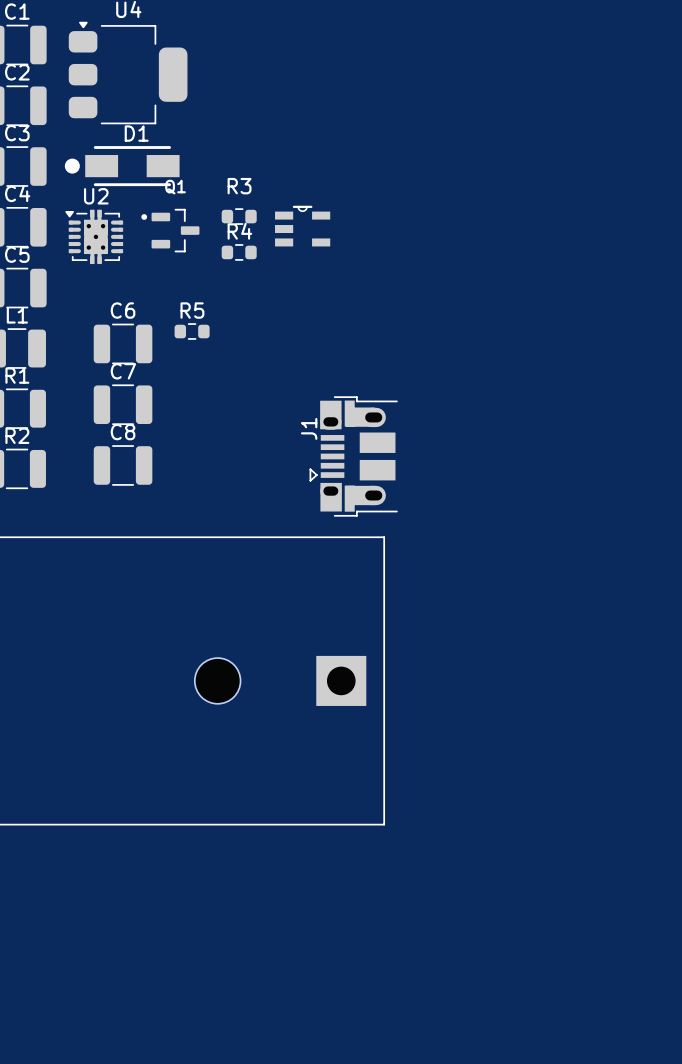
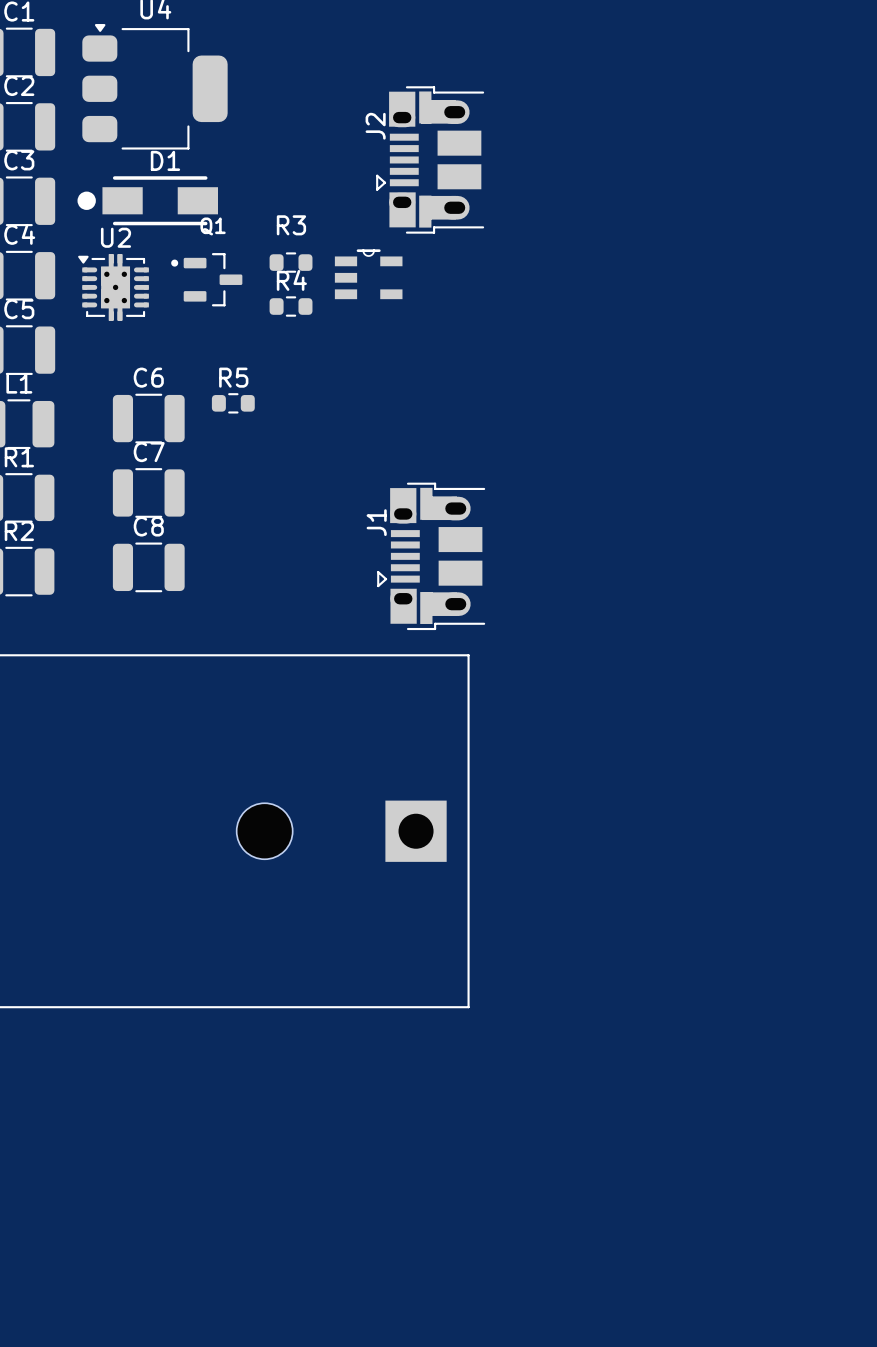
J2: none -> (430, 159)

